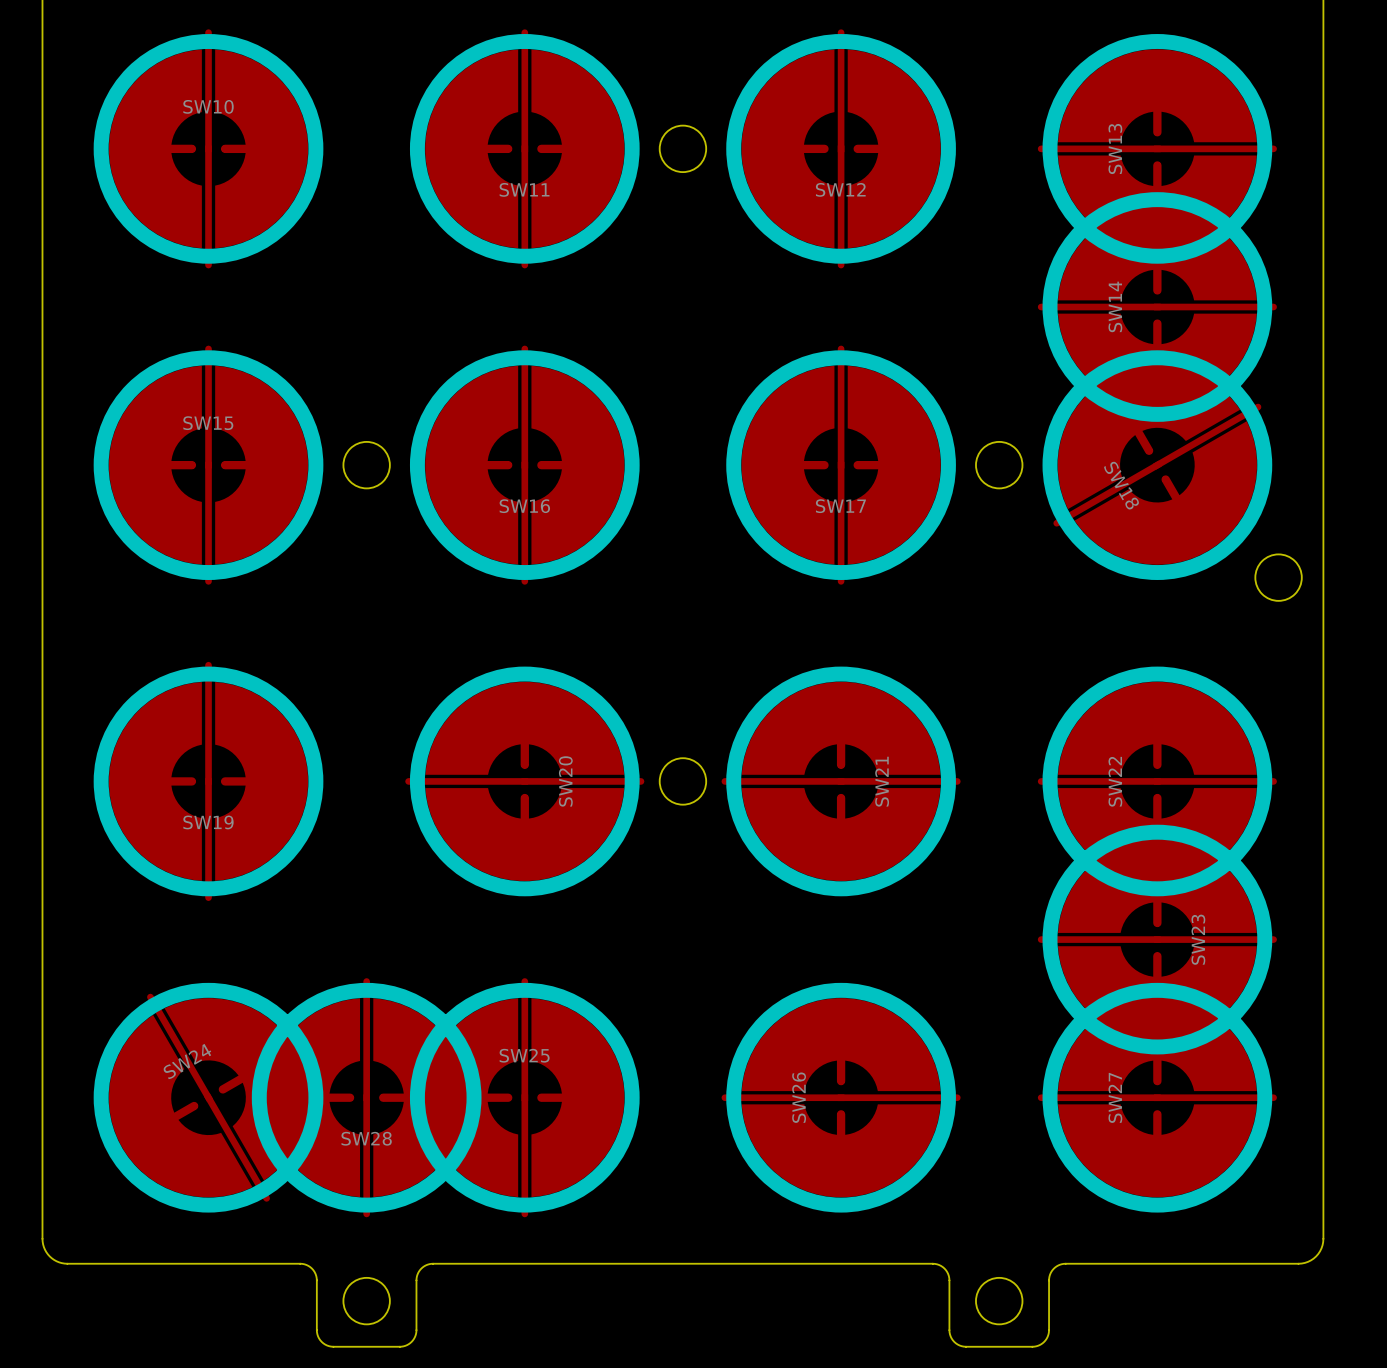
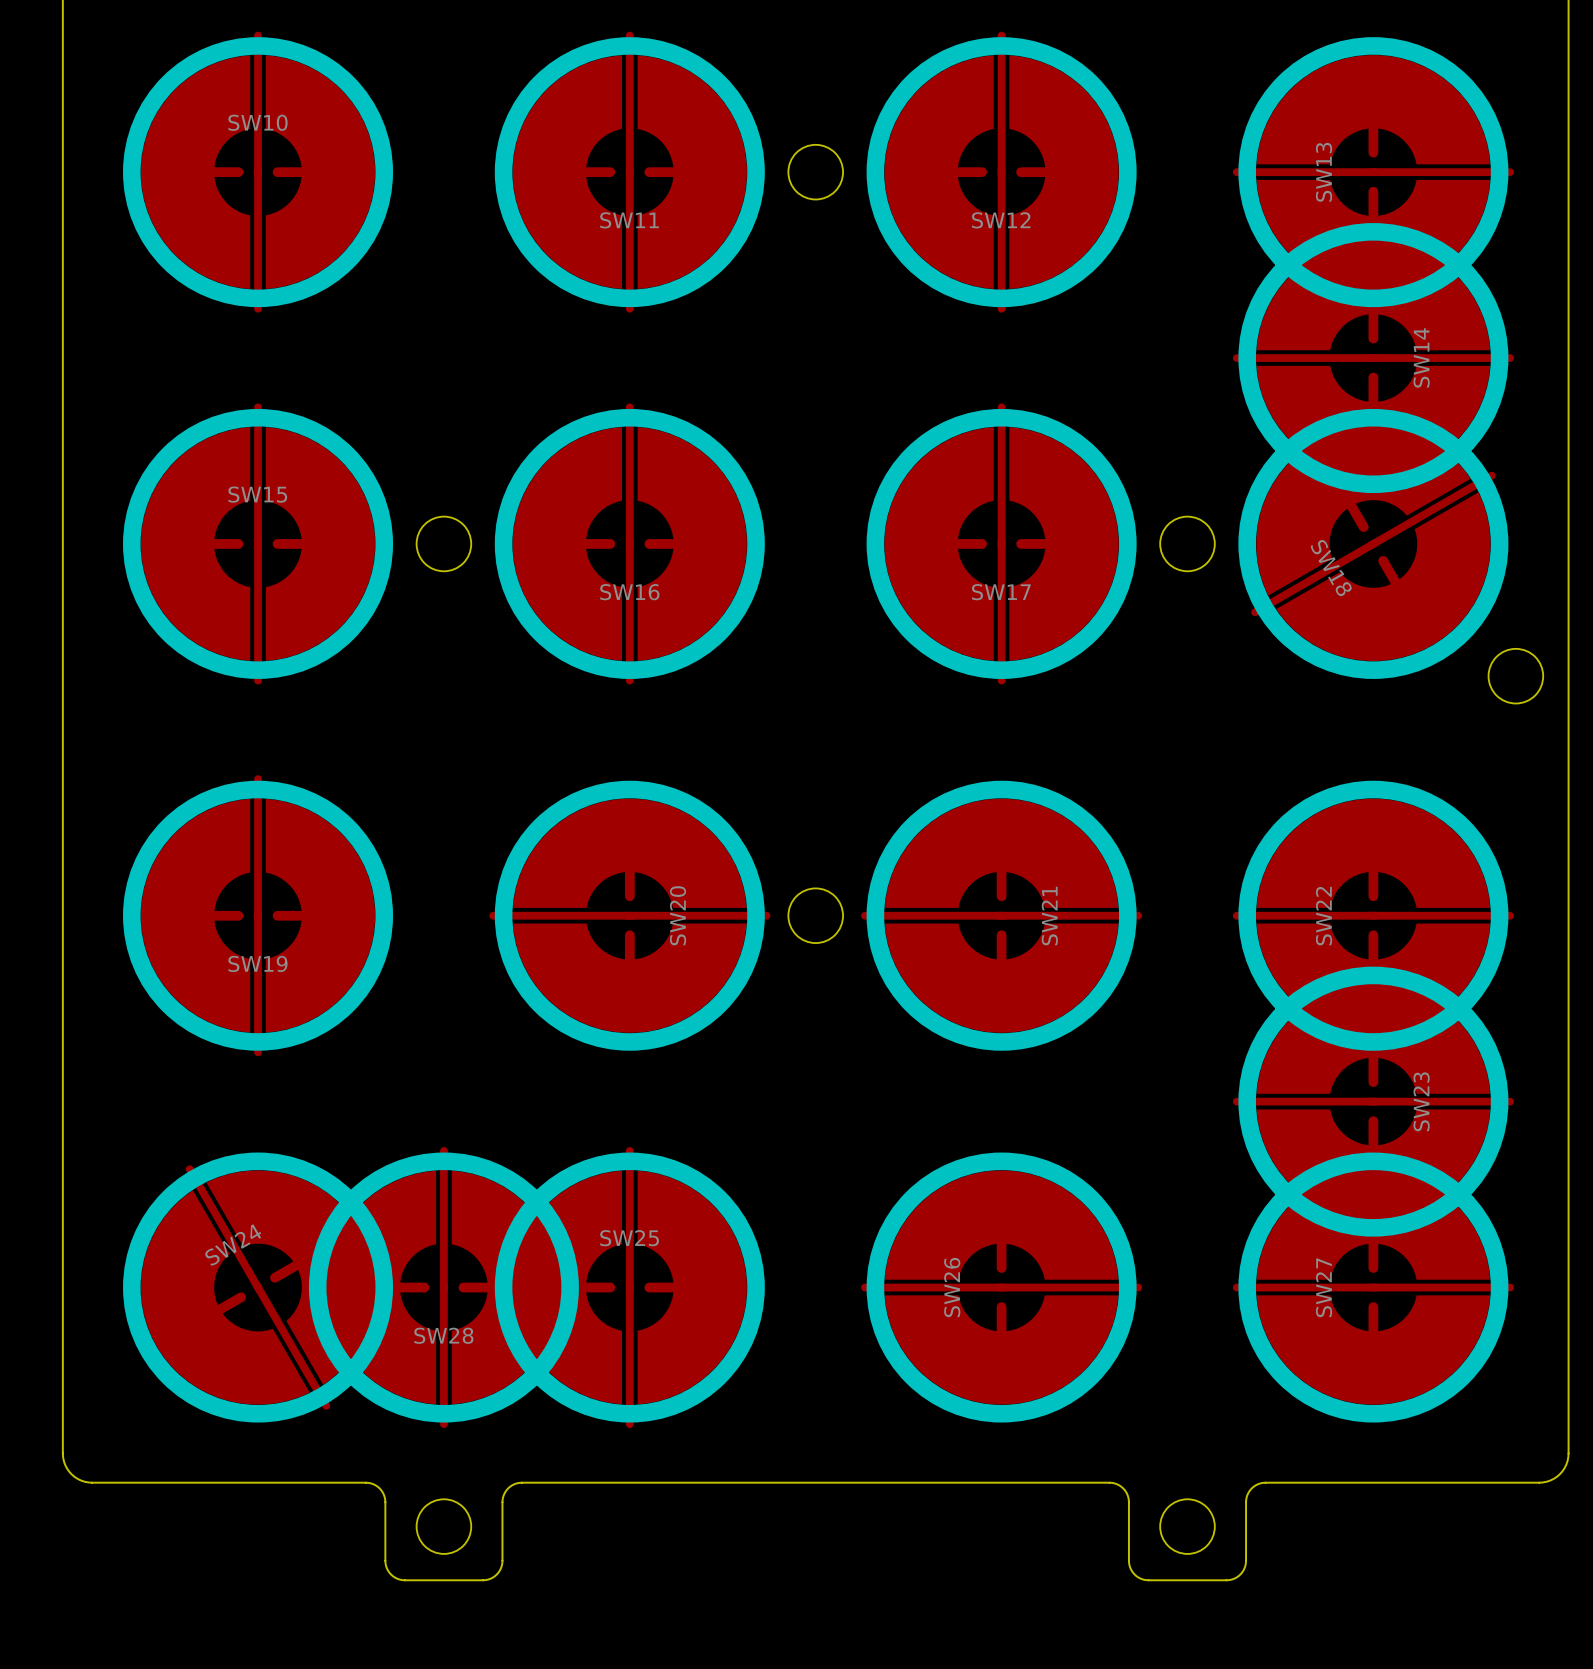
SW14 name position: SW14 (1115, 306) -> SW14 (1421, 357)

